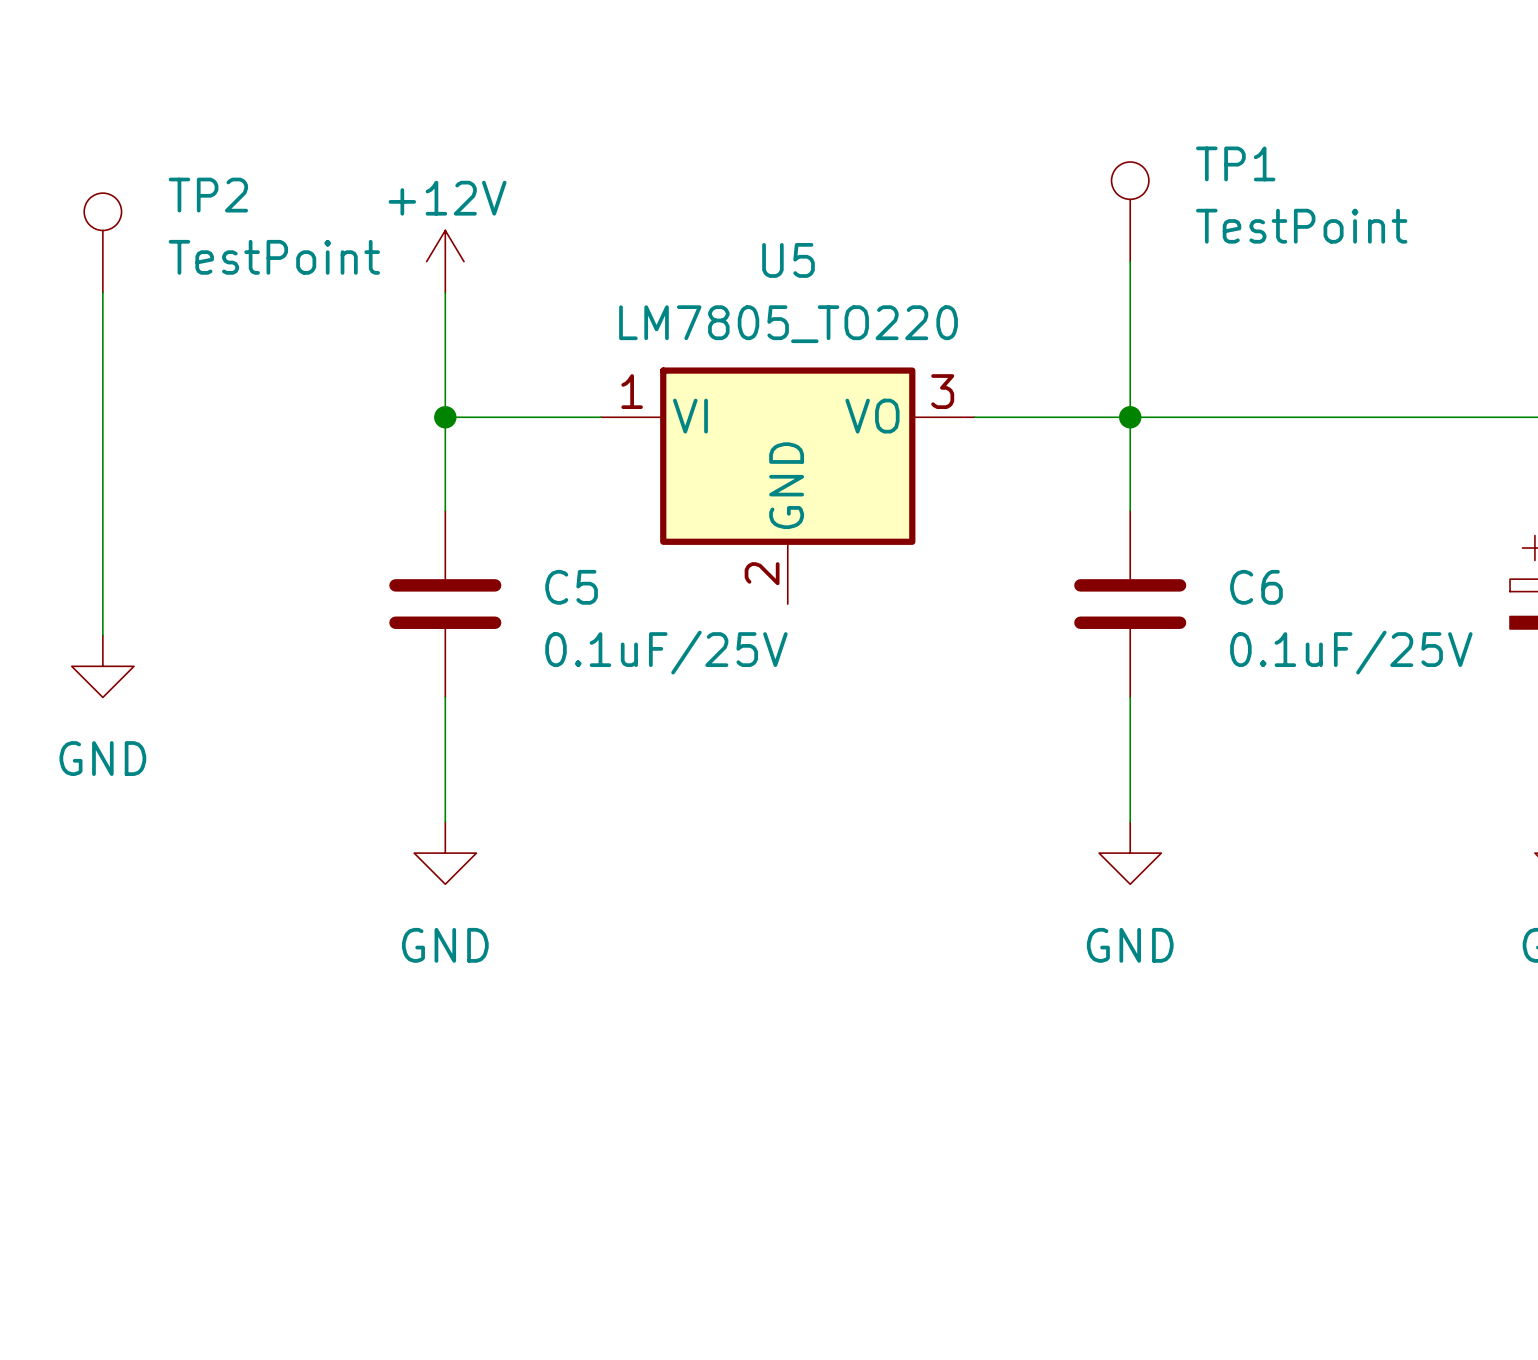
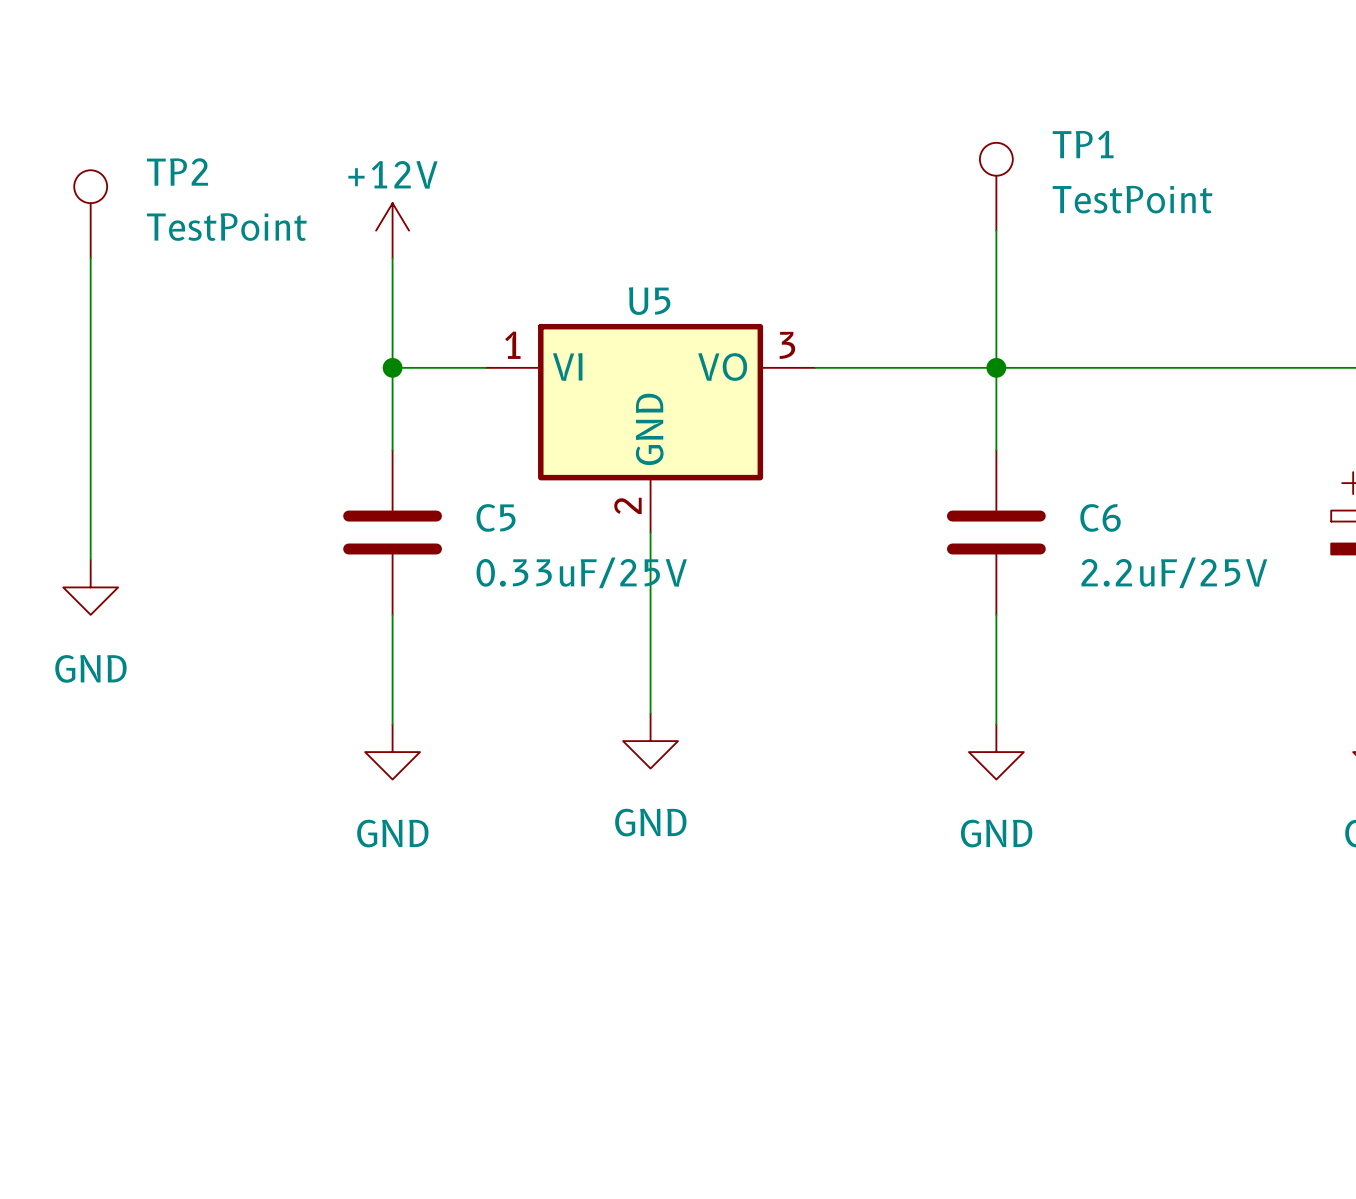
U5 name position: U5 (788, 260) -> U5 (649, 301)
U5 value: LM7805_TO220 (788, 324) -> none
U5 position: (787, 485) -> (650, 428)
wire: none -> (650, 532) (650, 713)
C5 value: 0.1uF/25V (666, 652) -> 0.33uF/25V (581, 572)
C6 value: 0.1uF/25V (1351, 652) -> 2.2uF/25V (1174, 572)
power symbol: none -> GND (650, 741)

